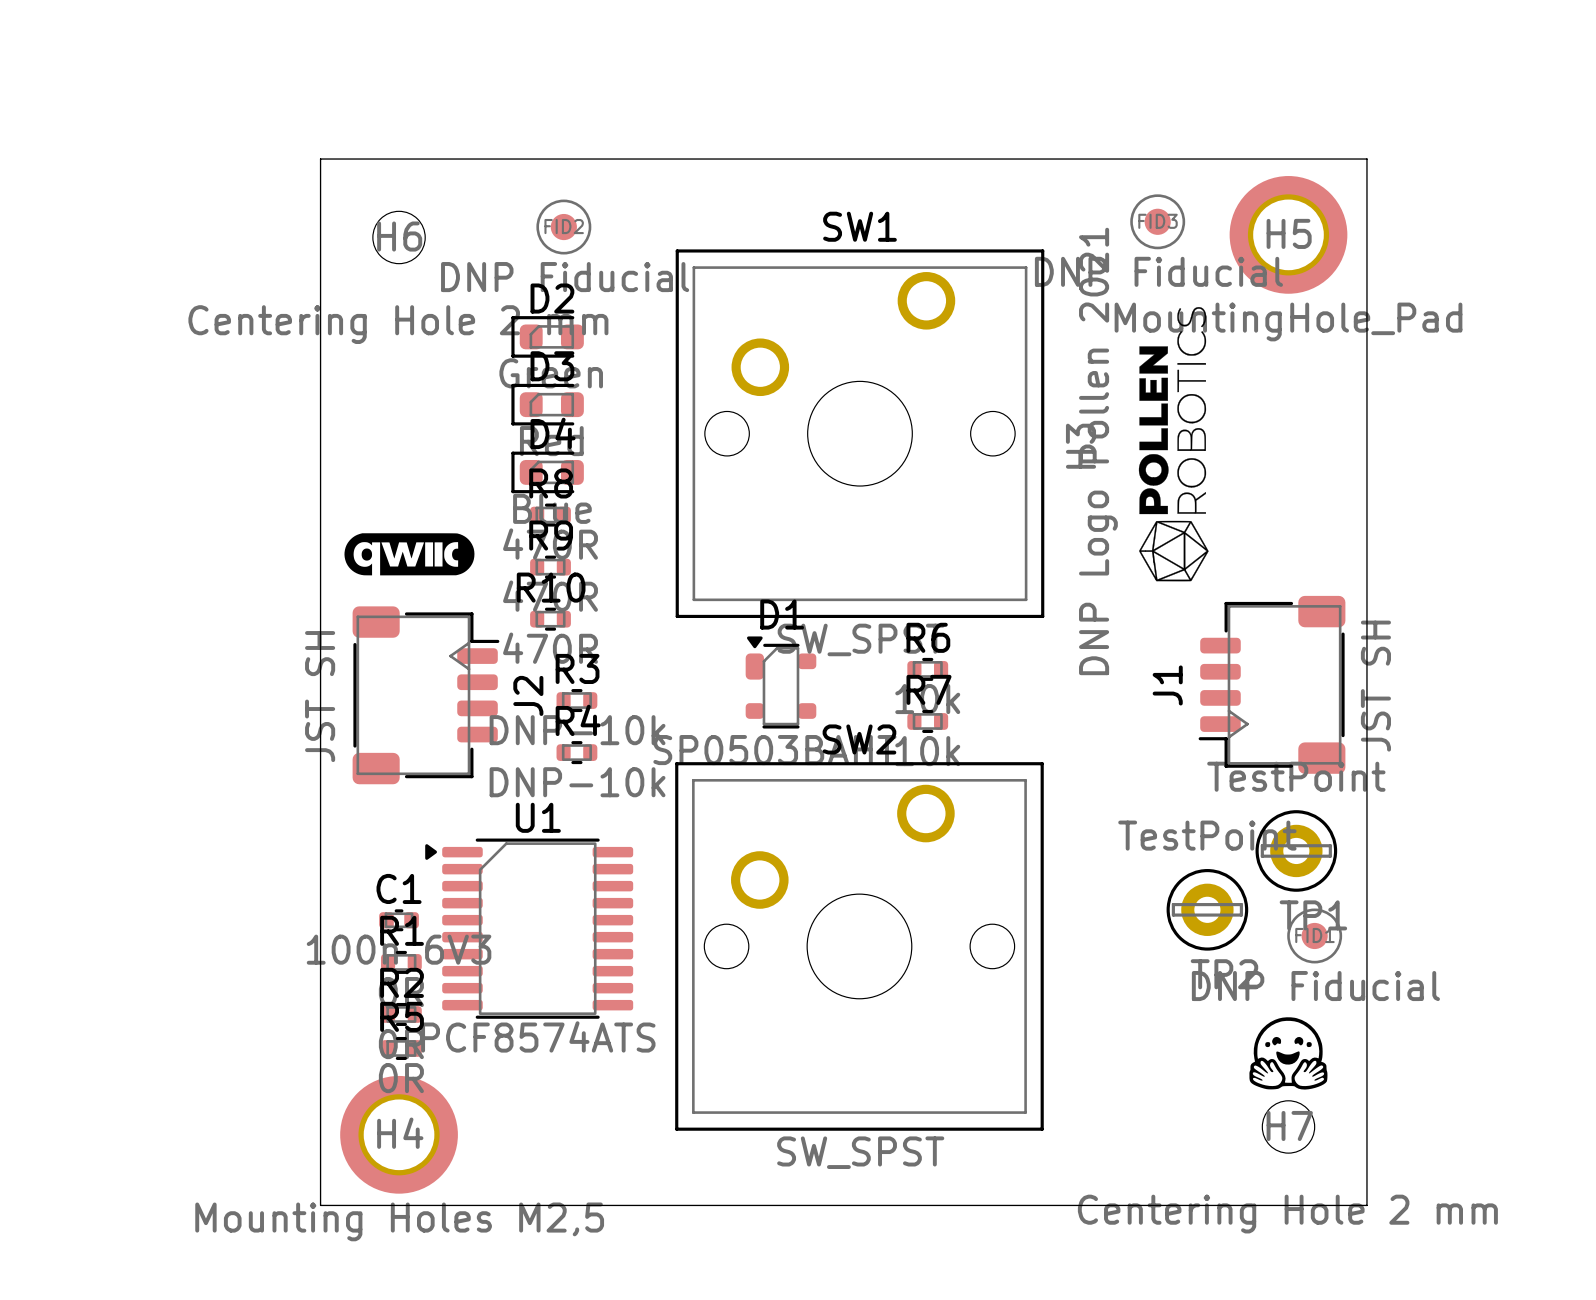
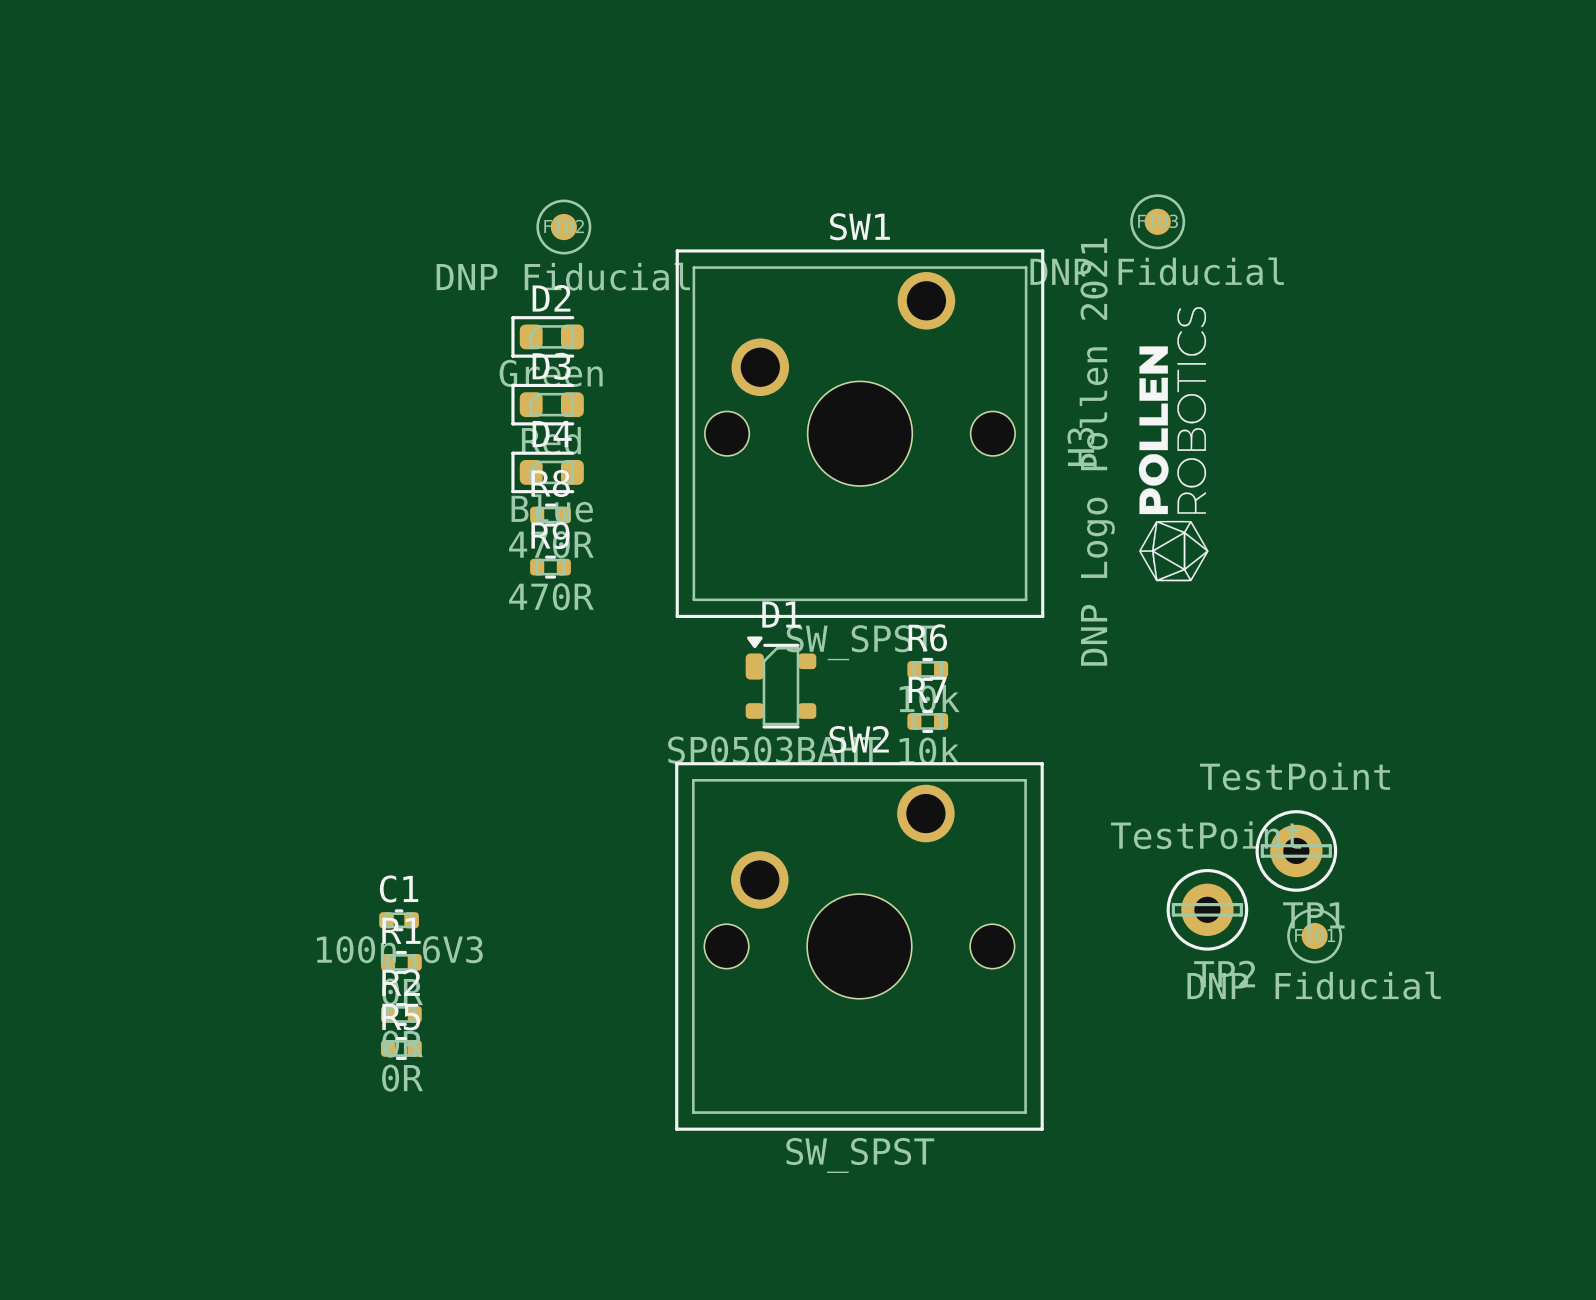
board edge: (320, 159) (1366, 159) (1366, 1205) (320, 1205) (320, 159) -> none
H5: MountingHole_Pad (1288, 234) -> none
H6: Centering Hole 2 mm (399, 237) -> none
drawing: [344, 533, 475, 576] -> none
R10: 470R (550, 619) -> none
J1: JST SH (1272, 684) -> none
J2: JST SH (425, 695) -> none
R3: DNP-10k (576, 700) -> none
R4: DNP-10k (576, 752) -> none
U1: PCF8574ATS (529, 928) -> none
drawing: [1249, 1017, 1328, 1090] -> none
H7: Centering Hole 2 mm (1288, 1126) -> none
H4: Mounting Holes M2,5 (399, 1134) -> none

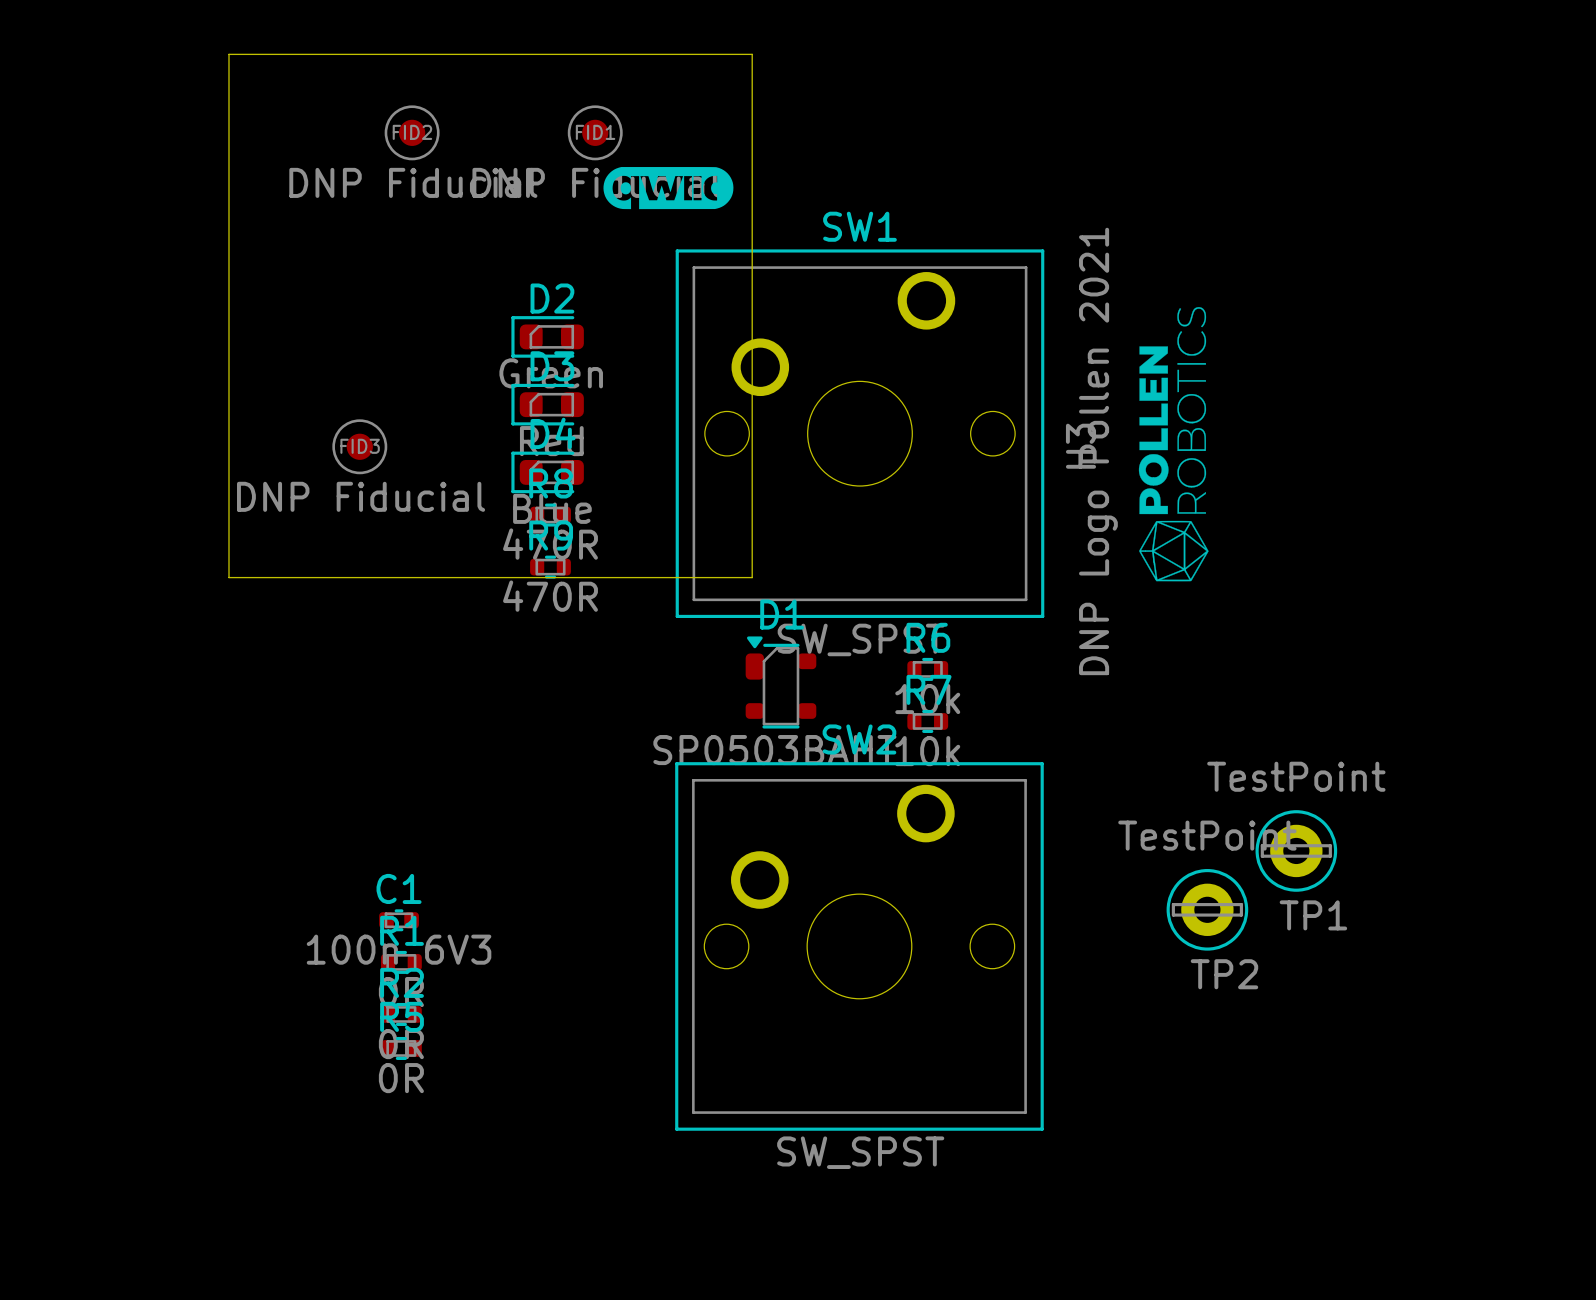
board edge: none -> (228, 54) (752, 54) (752, 577) (228, 577) (228, 54)
drawing: none -> [603, 167, 734, 210]
FID3 position: (1157, 221) -> (359, 446)
FID2 position: (563, 227) -> (412, 132)
FID1 position: (1314, 935) -> (595, 132)

